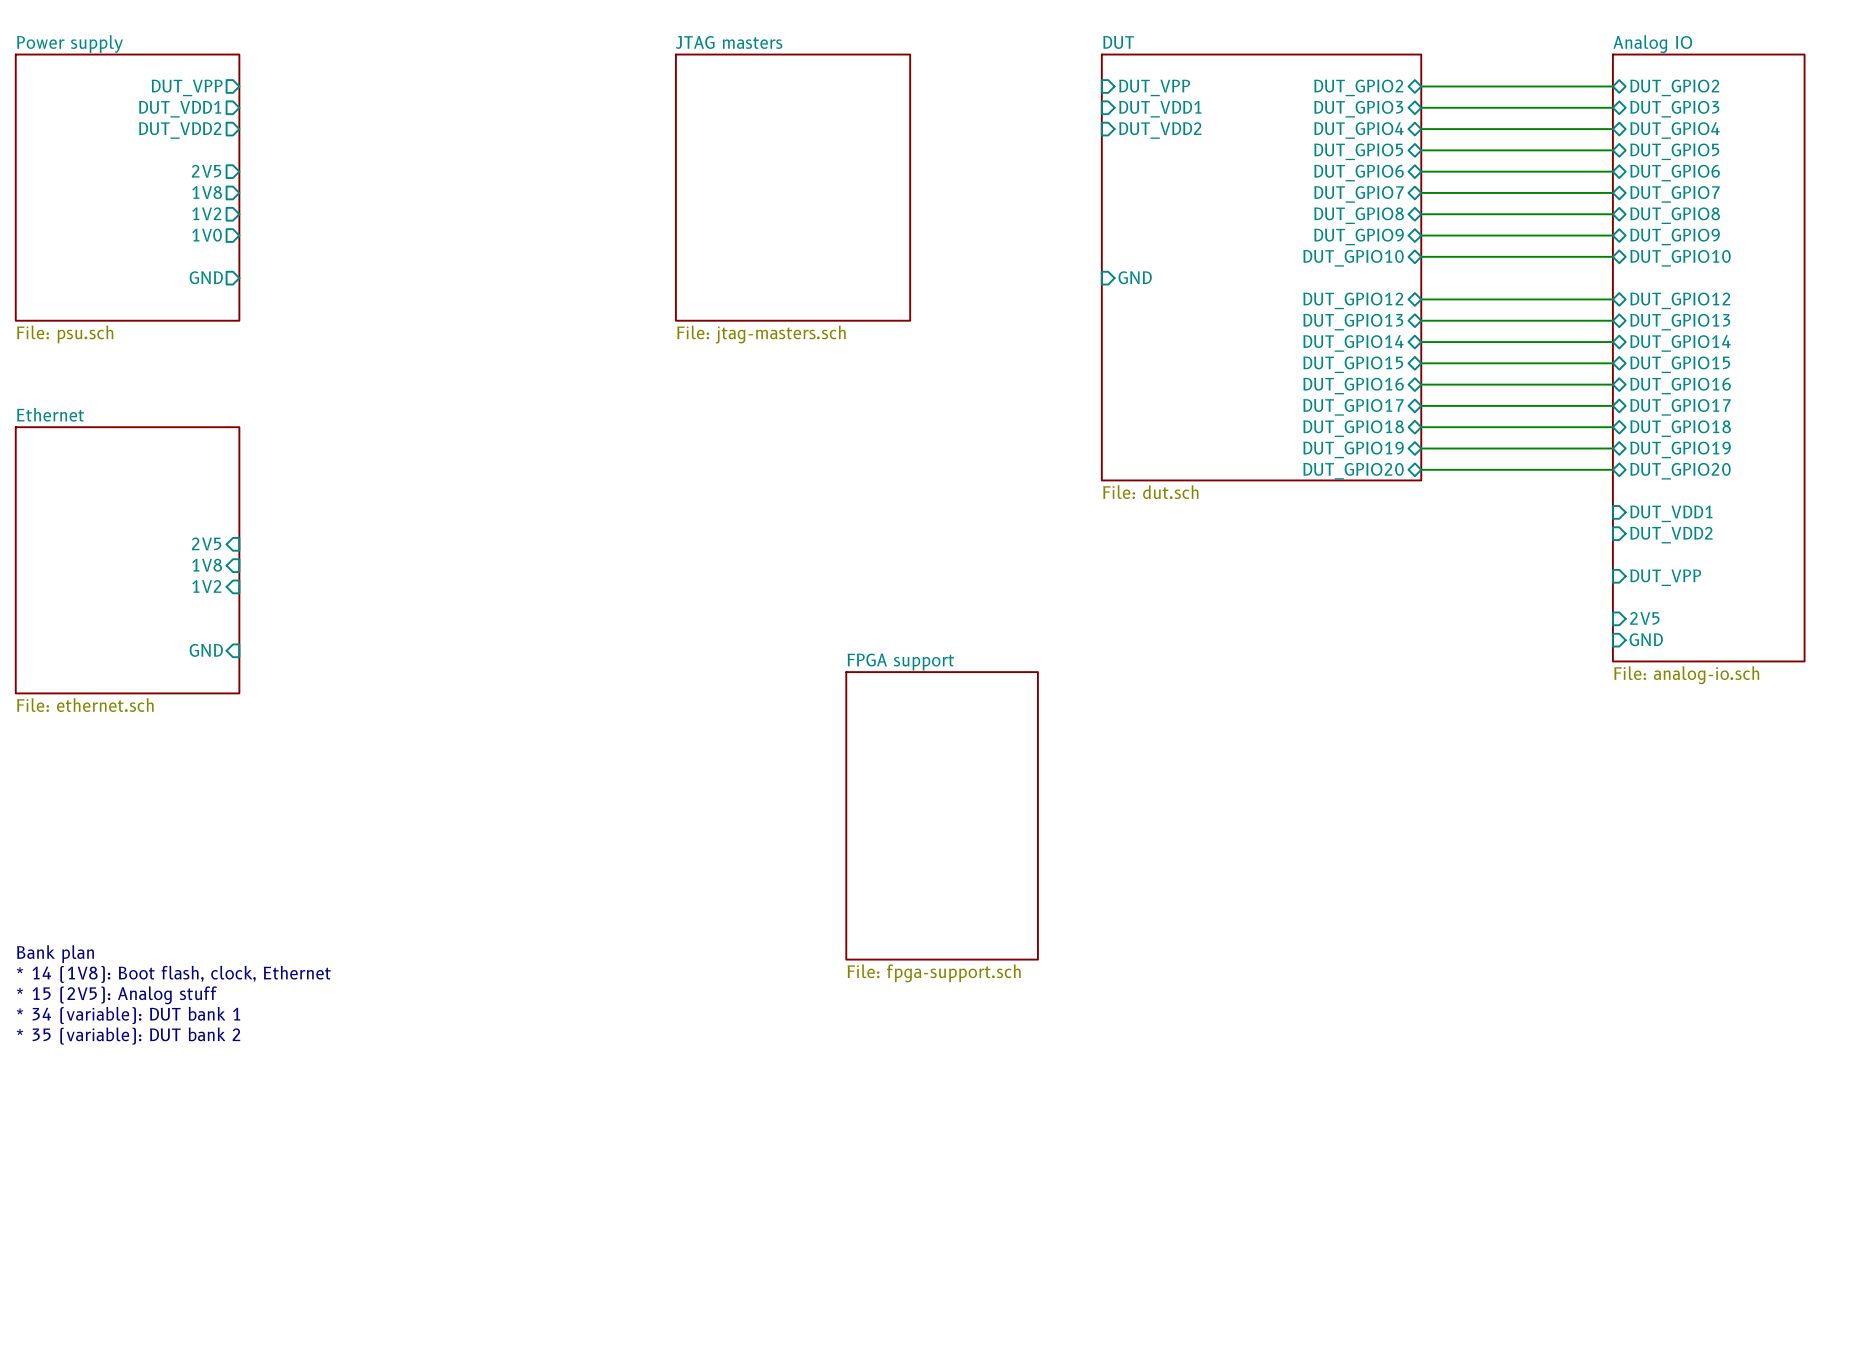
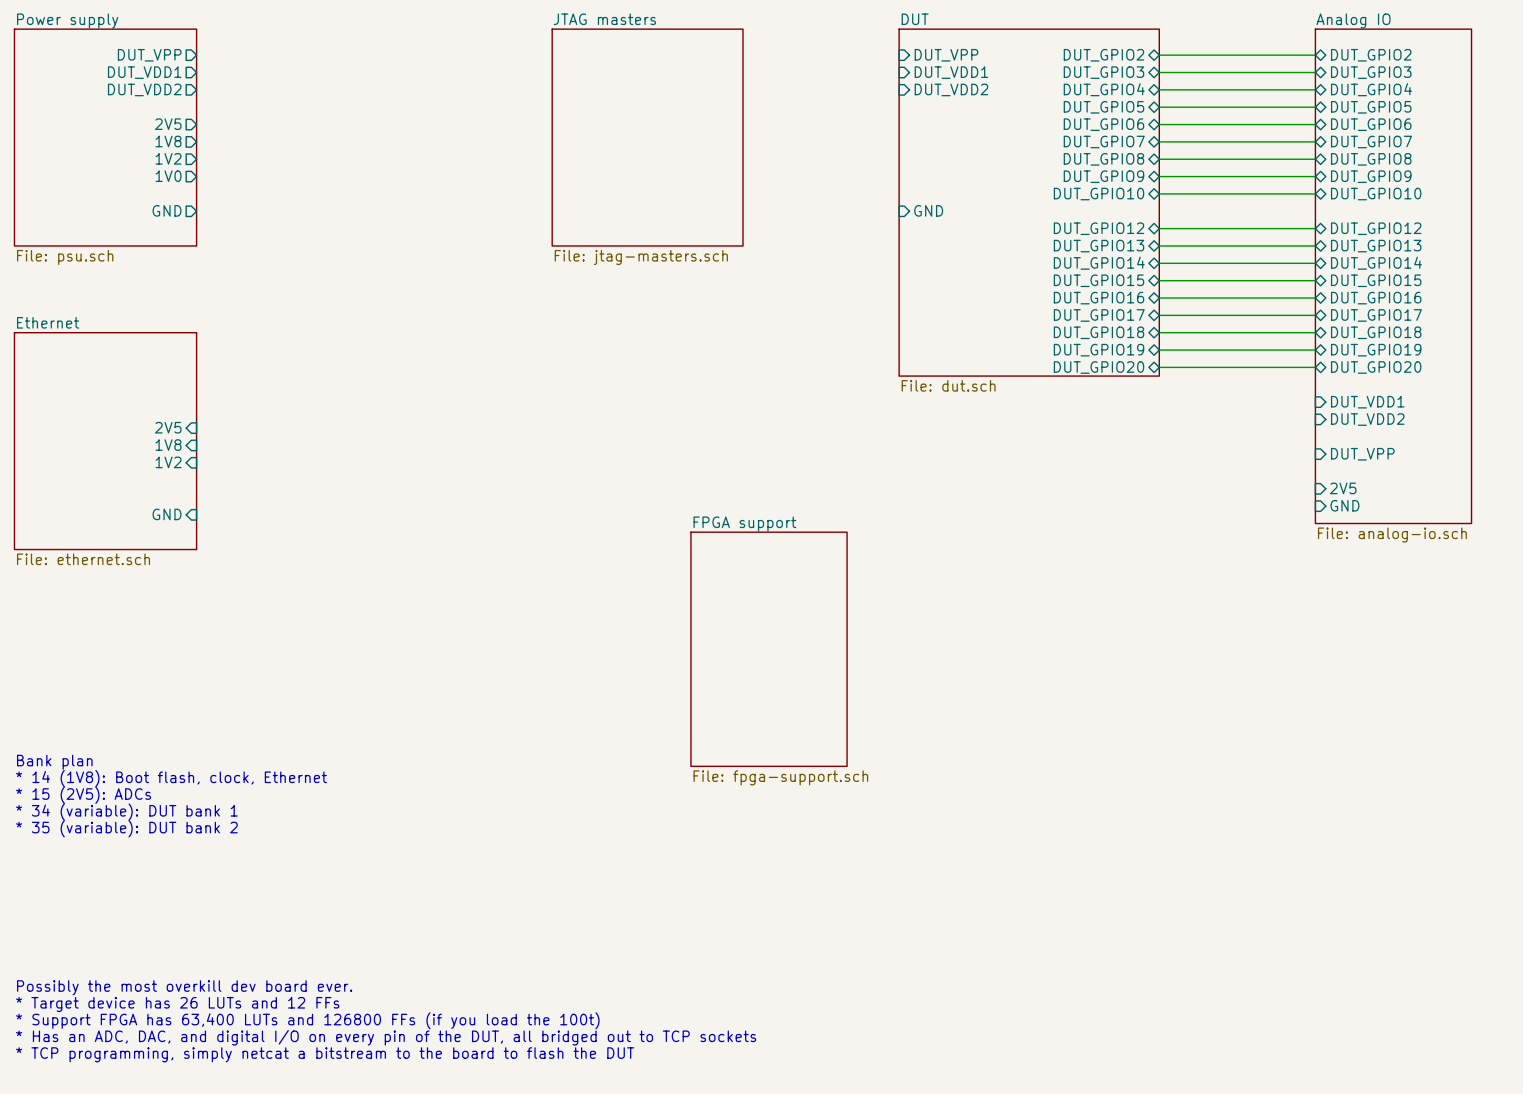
text: * 15 (2V5): Analog stuff (116, 995) -> * 15 (2V5): ADCs (83, 795)
text: none -> Possibly the most overkill dev board ever. (184, 987)
text: none -> * Target device has 26 LUTs and 12 FFs (177, 1004)
text: none -> * Support FPGA has 63,400 LUTs and 126800 FFs (if you load the 100t) (307, 1020)
text: none -> * Has an ADC, DAC, and digital I/O on every pin of the DUT, all bridged out to TCP sockets (386, 1037)
text: none -> * TCP programming, simply netcat a bitstream to the board to flash the DUT (325, 1054)

